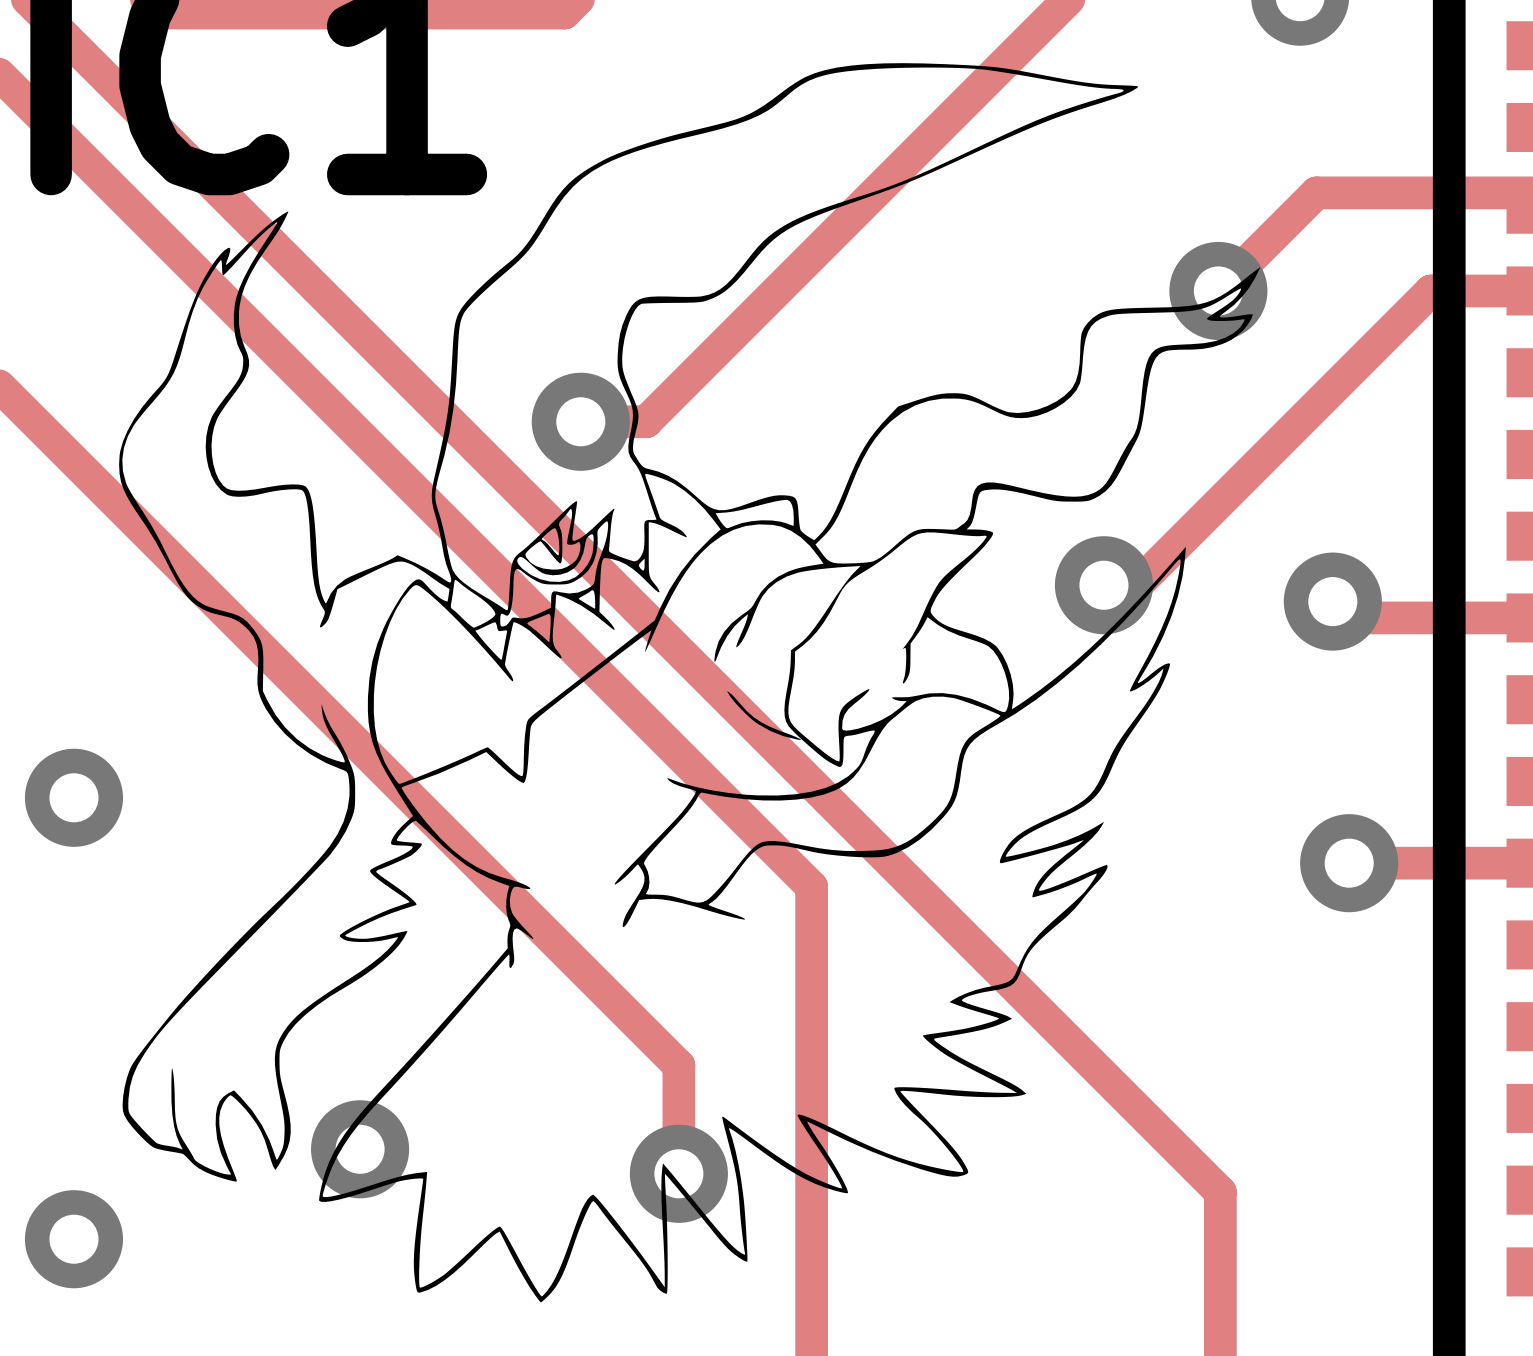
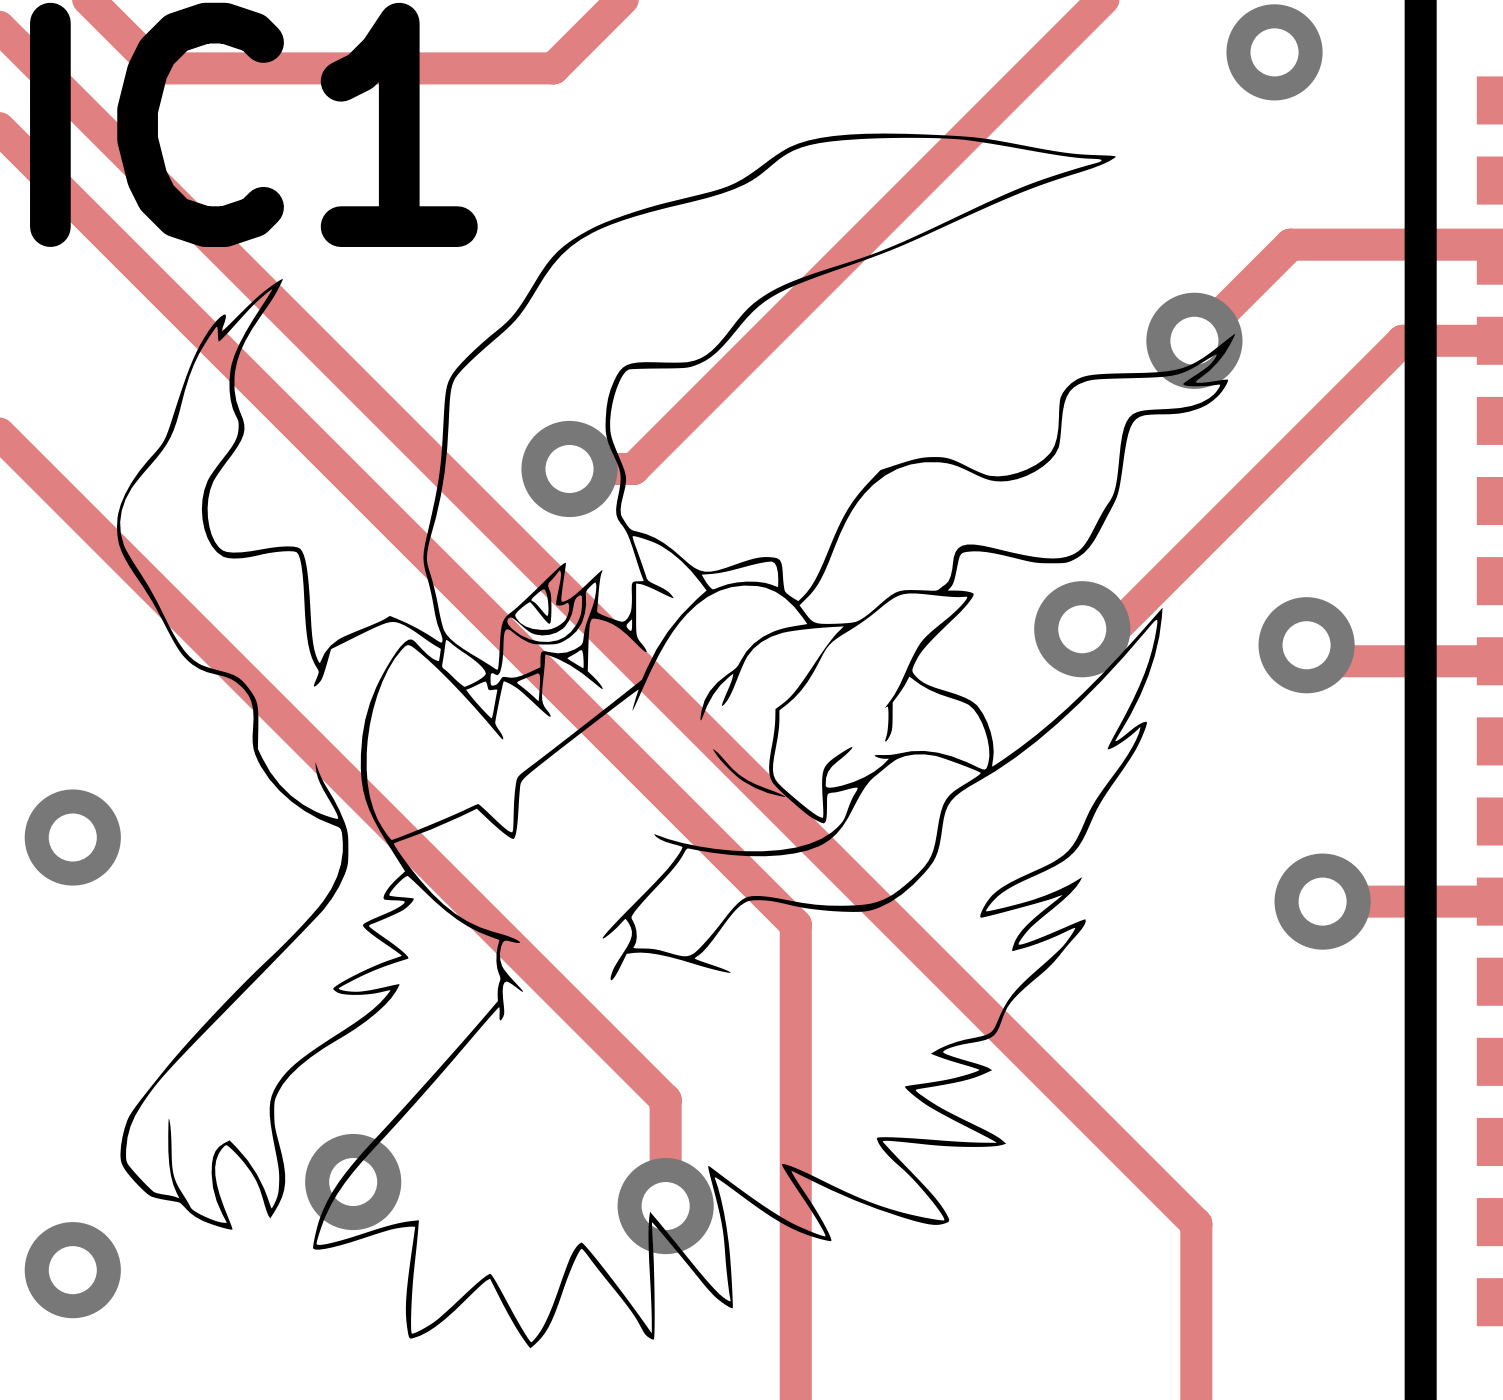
drawing position: (689, 682) -> (676, 740)

